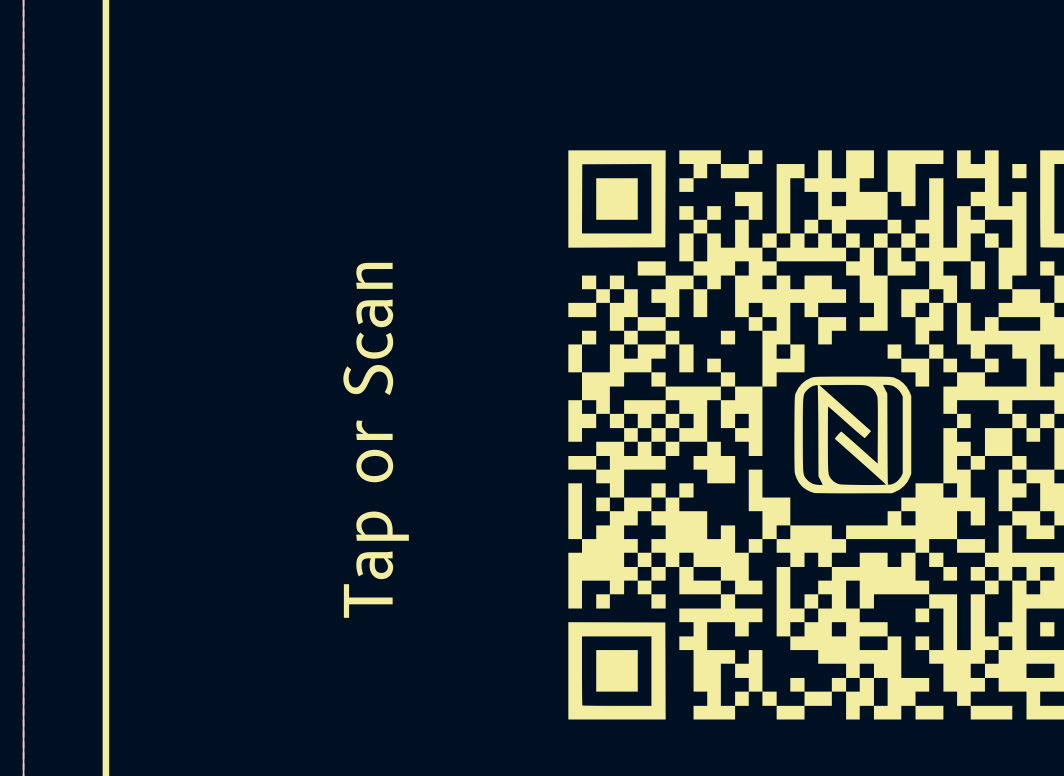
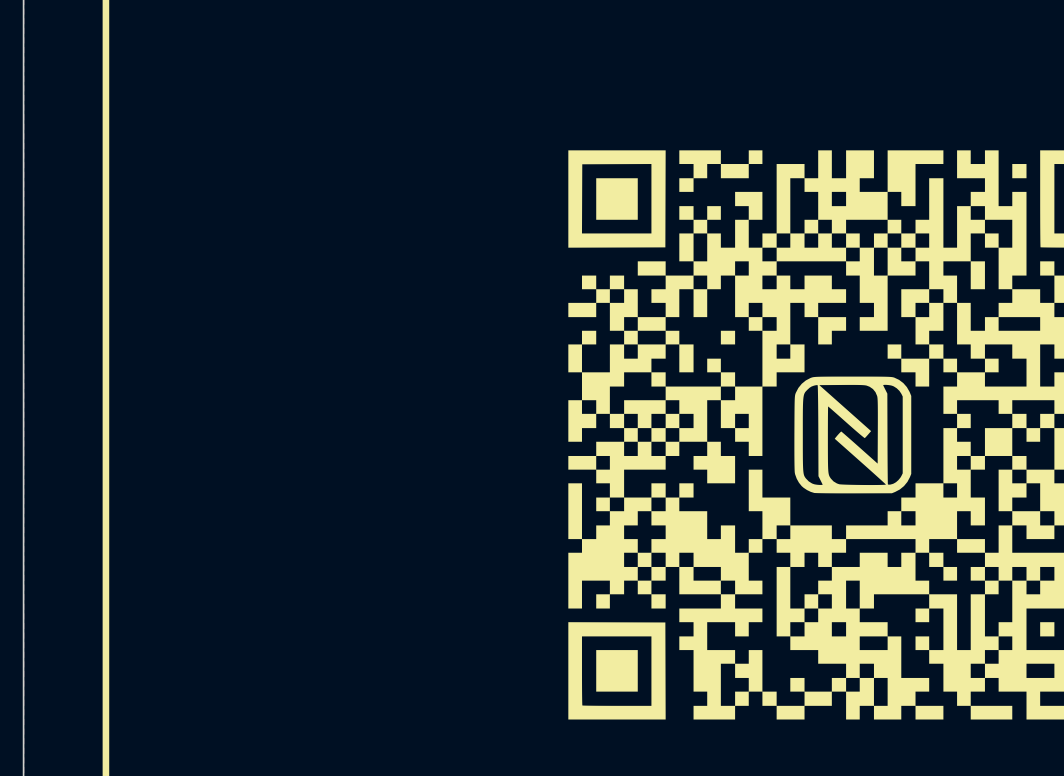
text: Tap or Scan (376, 440) -> none

